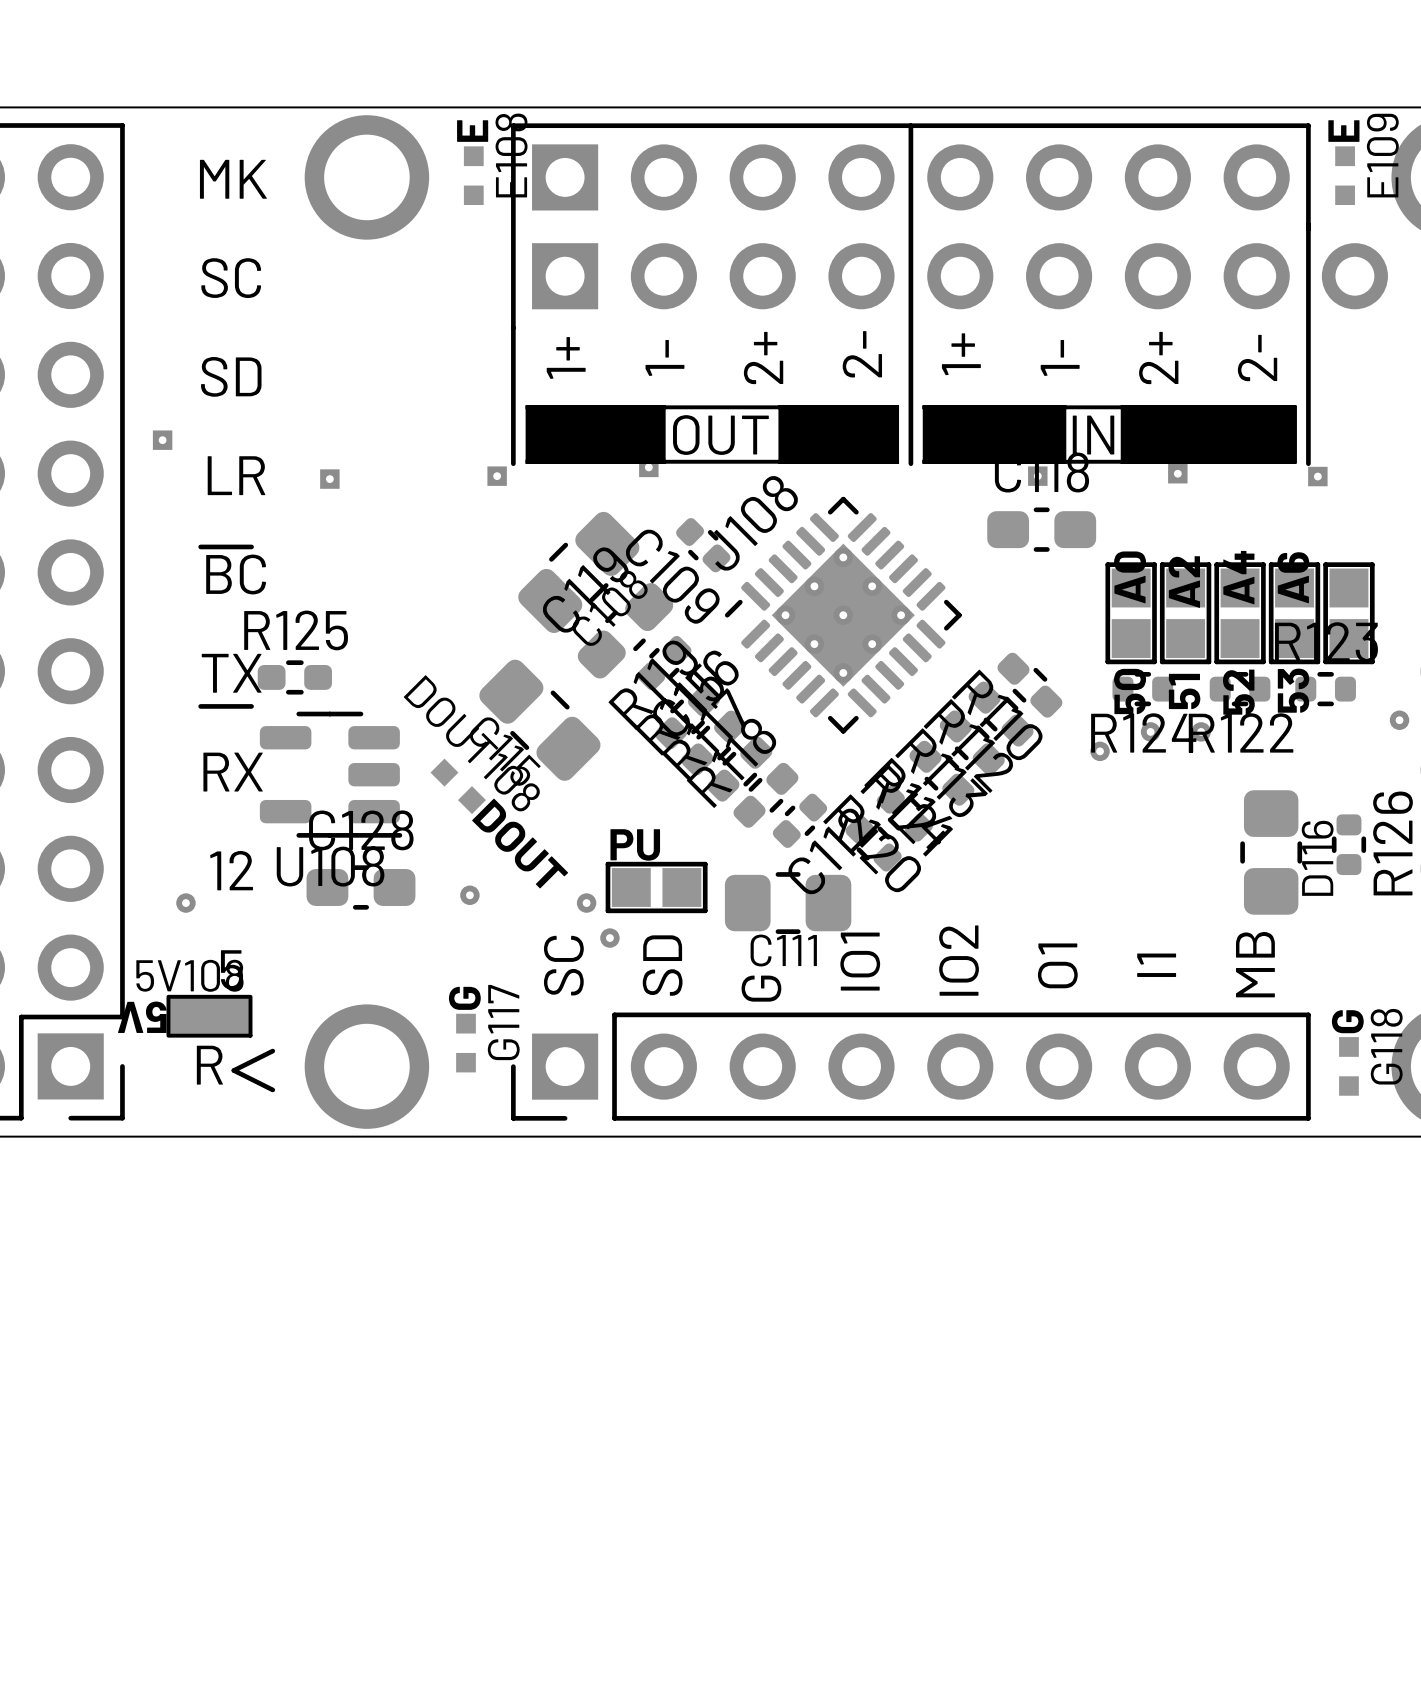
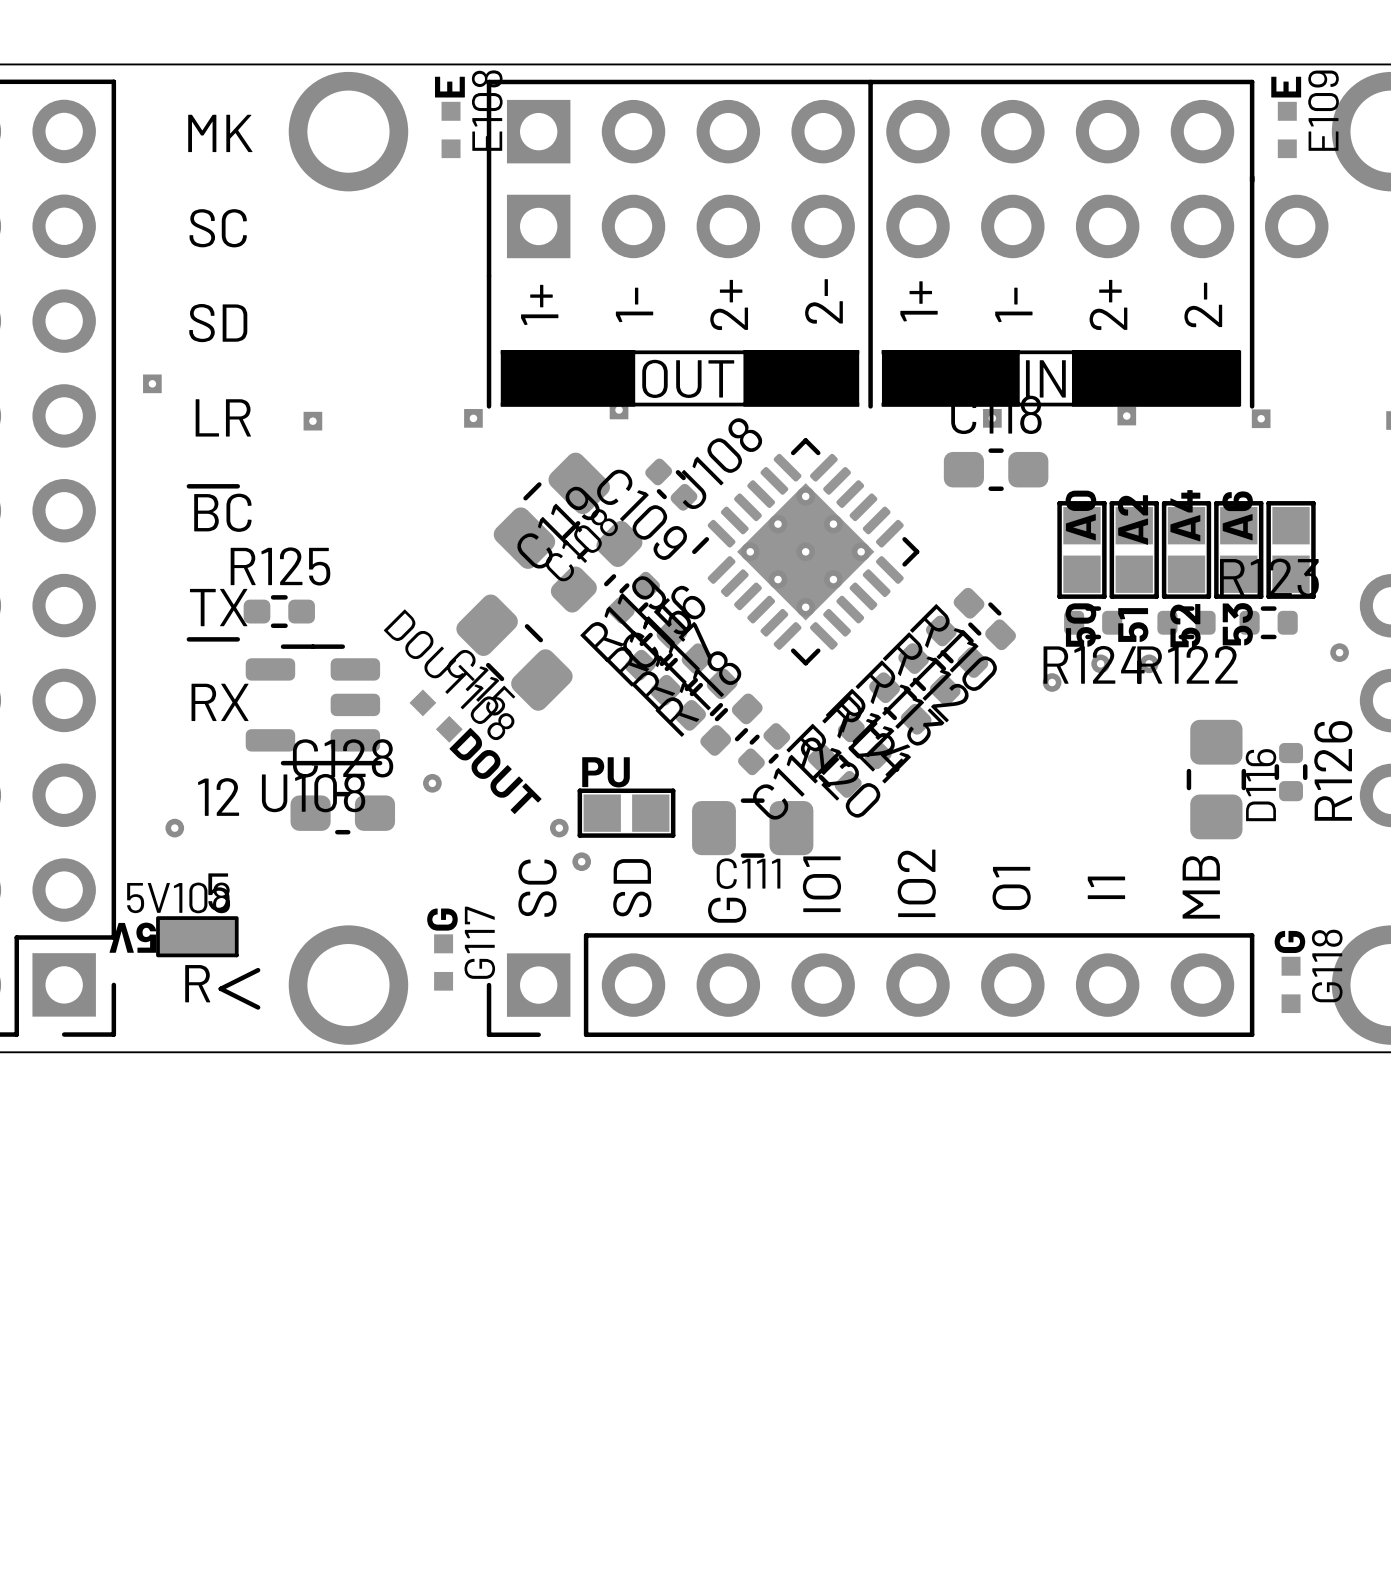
part position: (469, 895) -> (432, 783)

